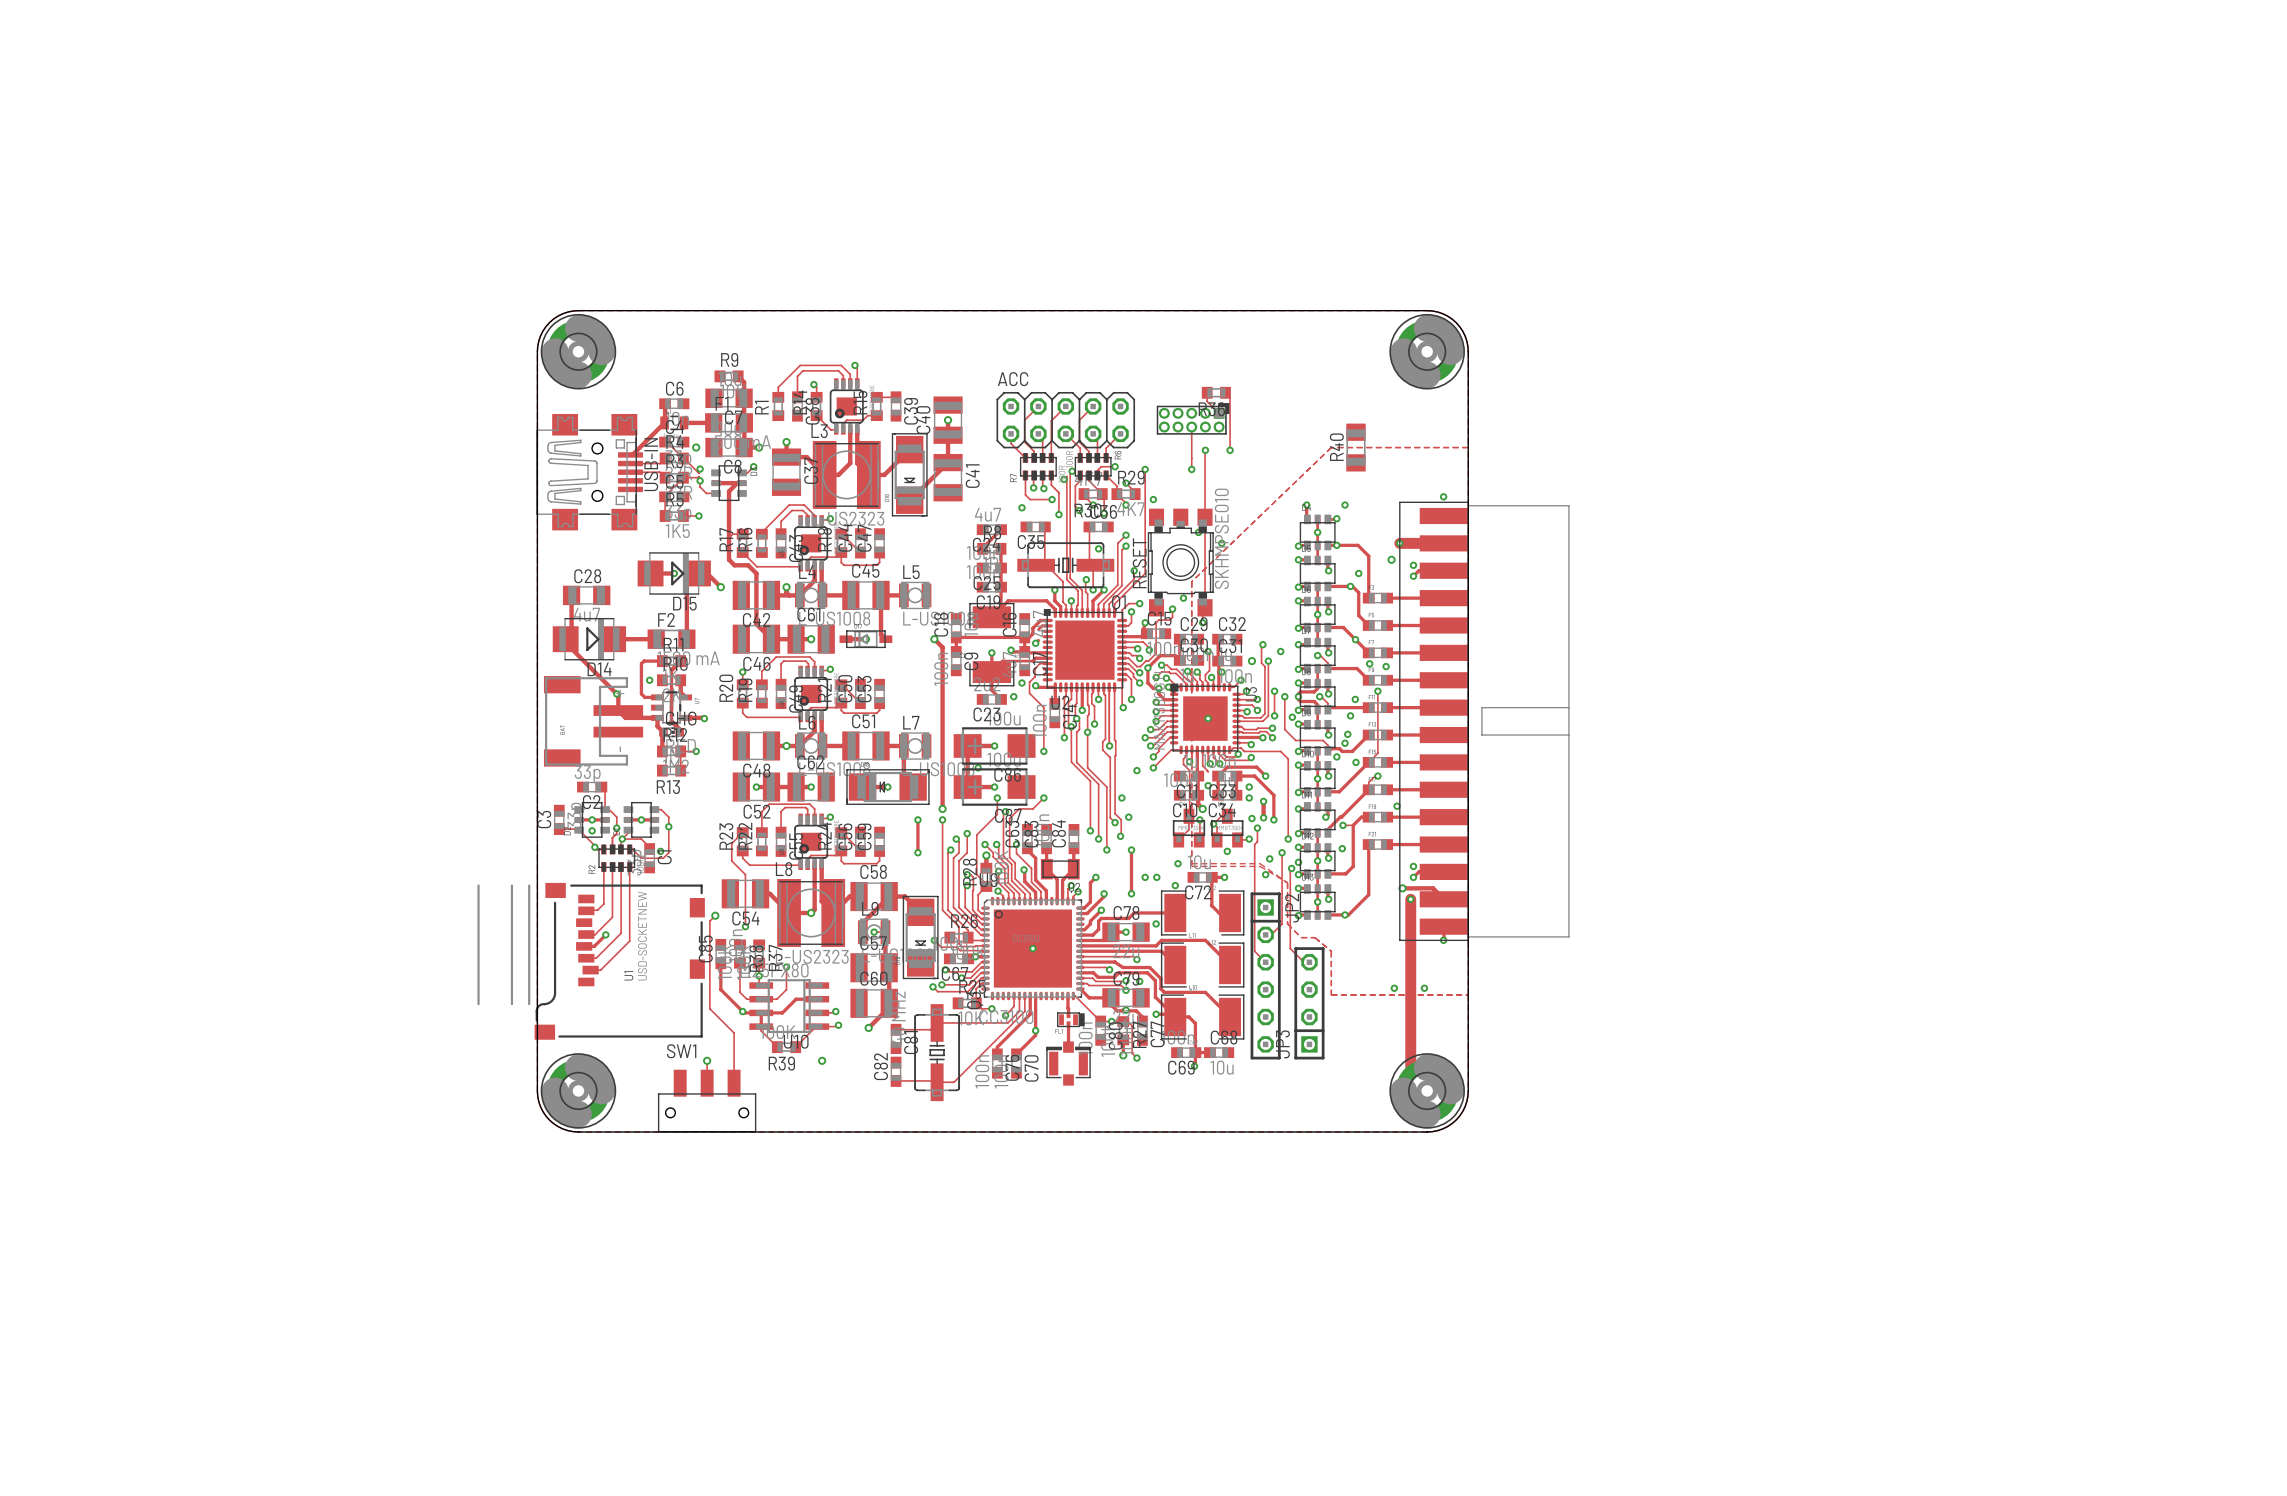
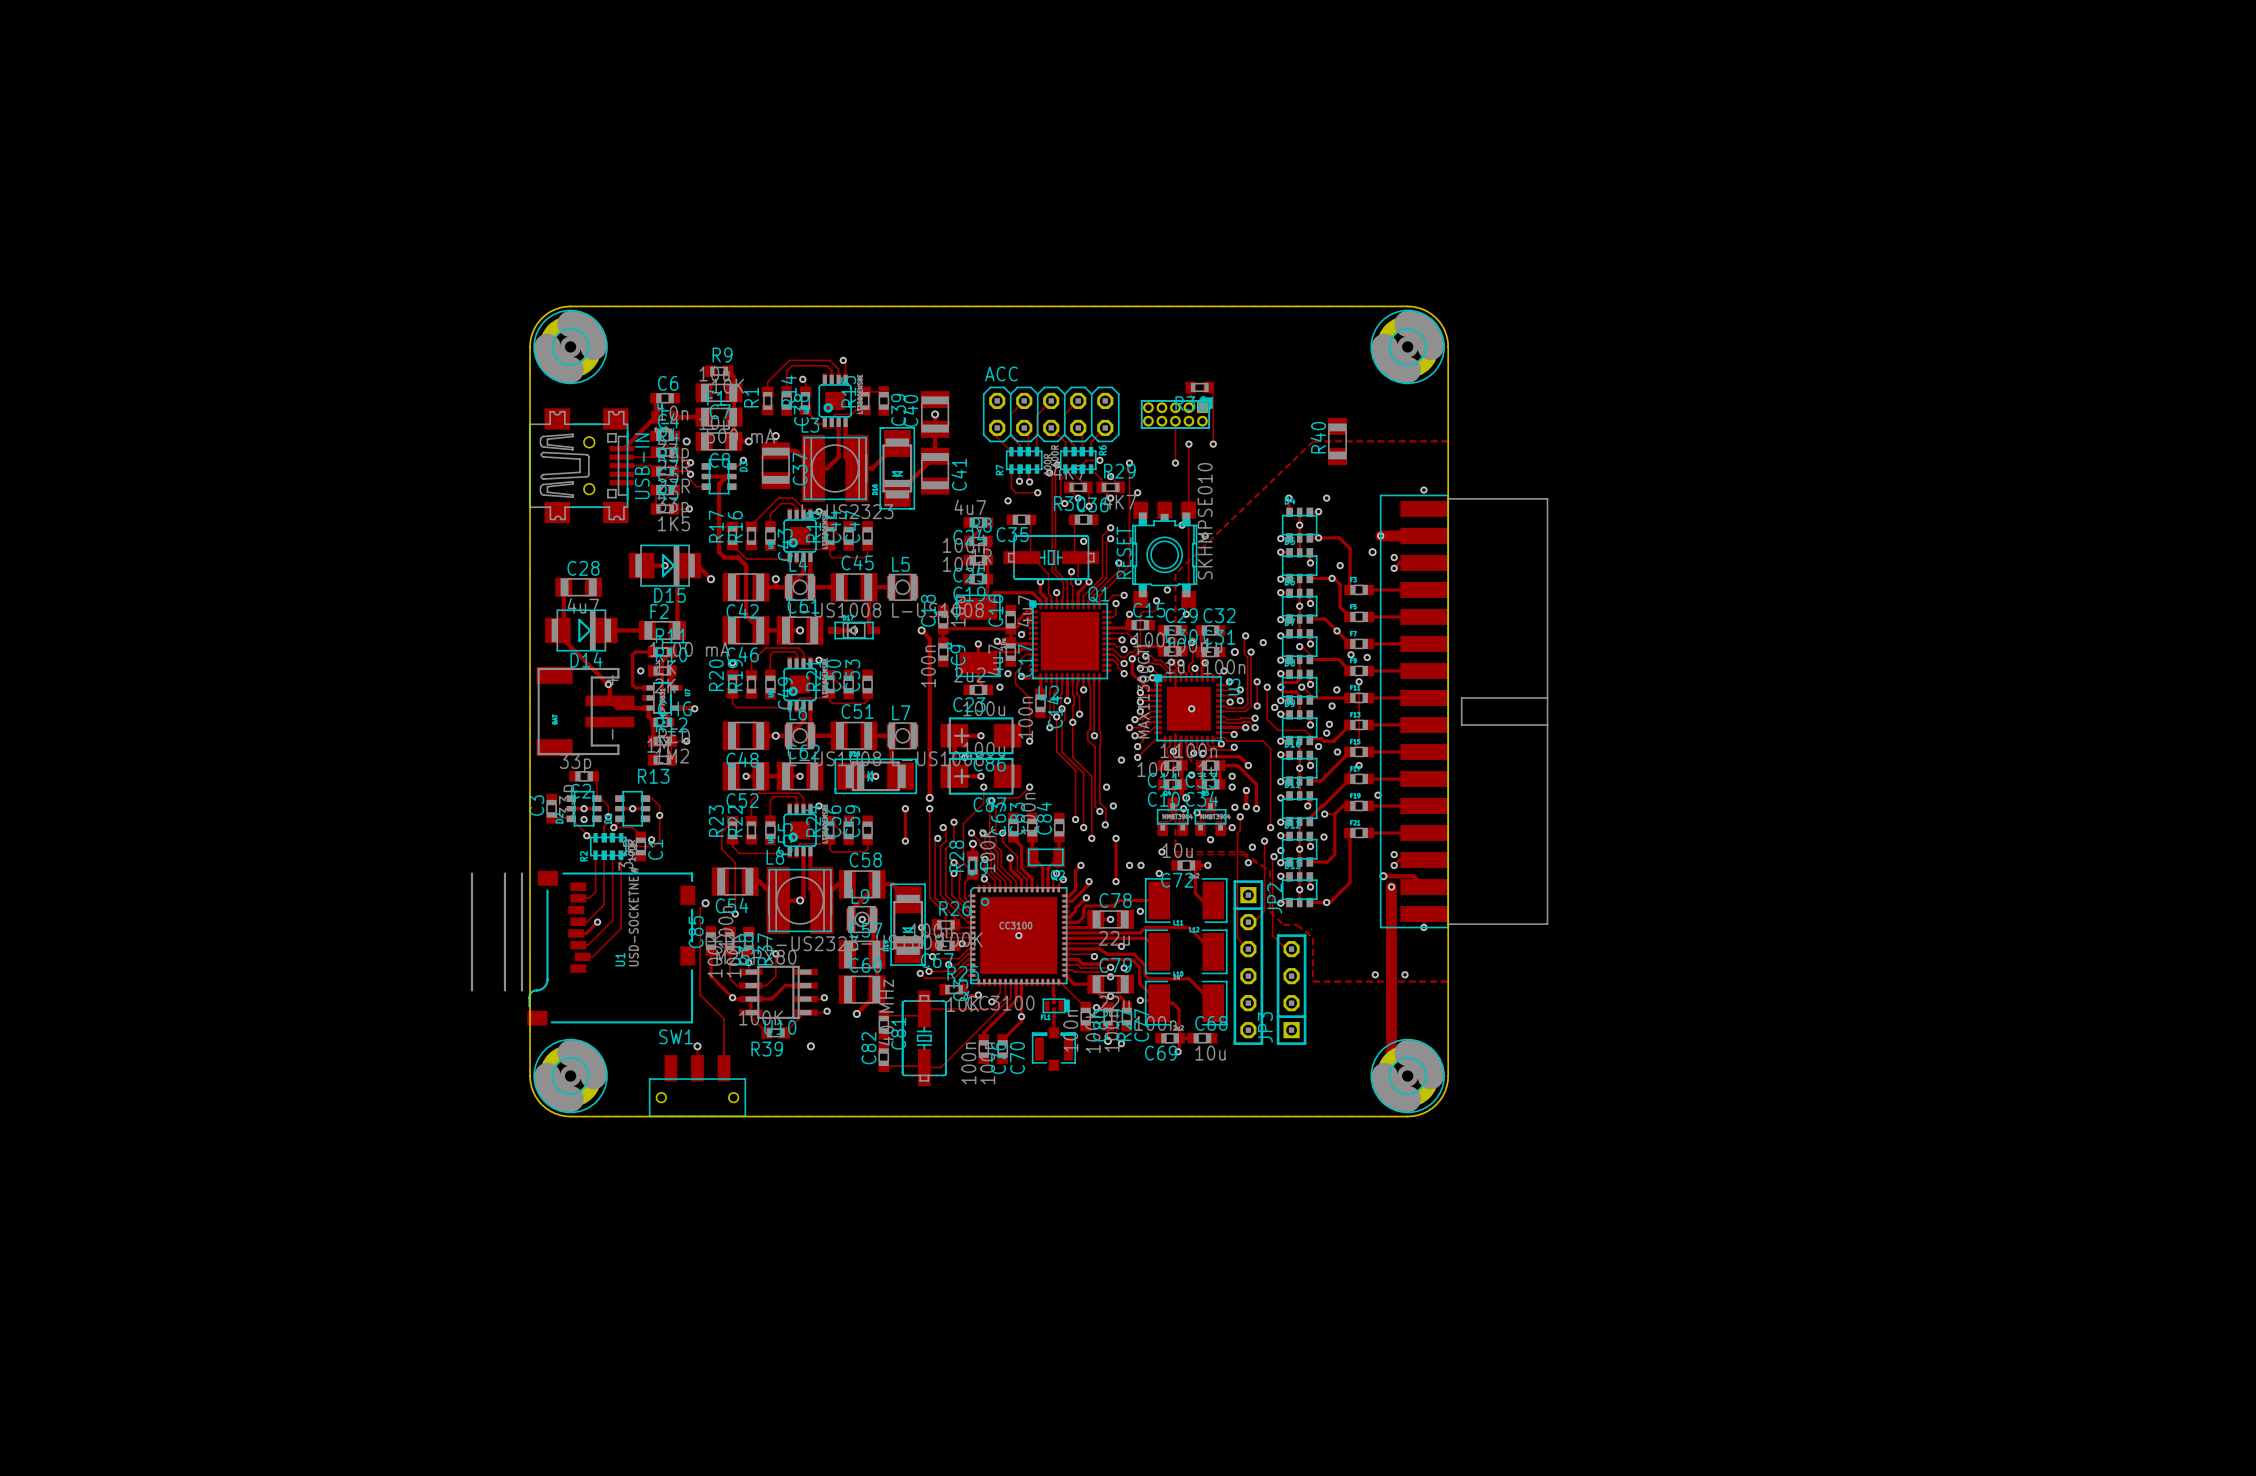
track: (1051, 475) (1051, 485) (1058, 492) (1058, 514) -> none
via: (1058, 514) -> none
track: (1122, 674) (1126, 674) (1131, 679) (1131, 699) -> none
track: (1122, 679) (1123, 707) -> none
via: (1131, 699) -> none
via: (1123, 707) -> none

